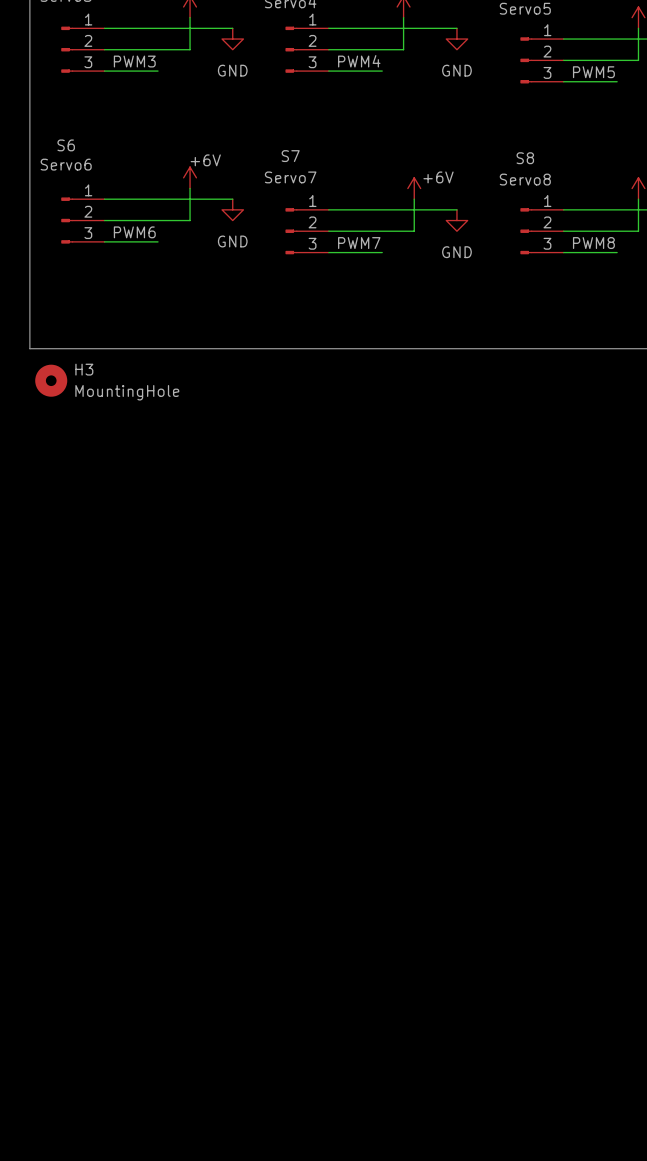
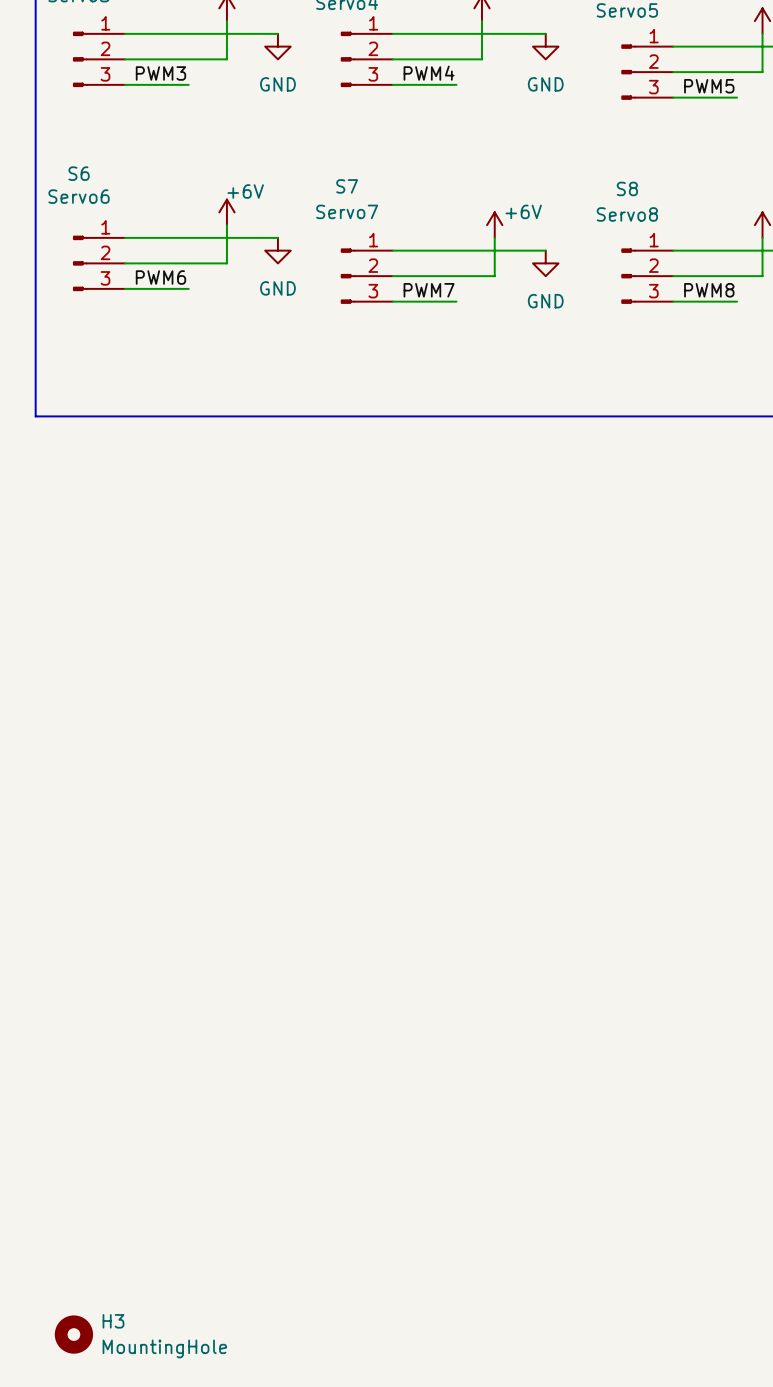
H3 position: (51, 380) -> (73, 1334)

